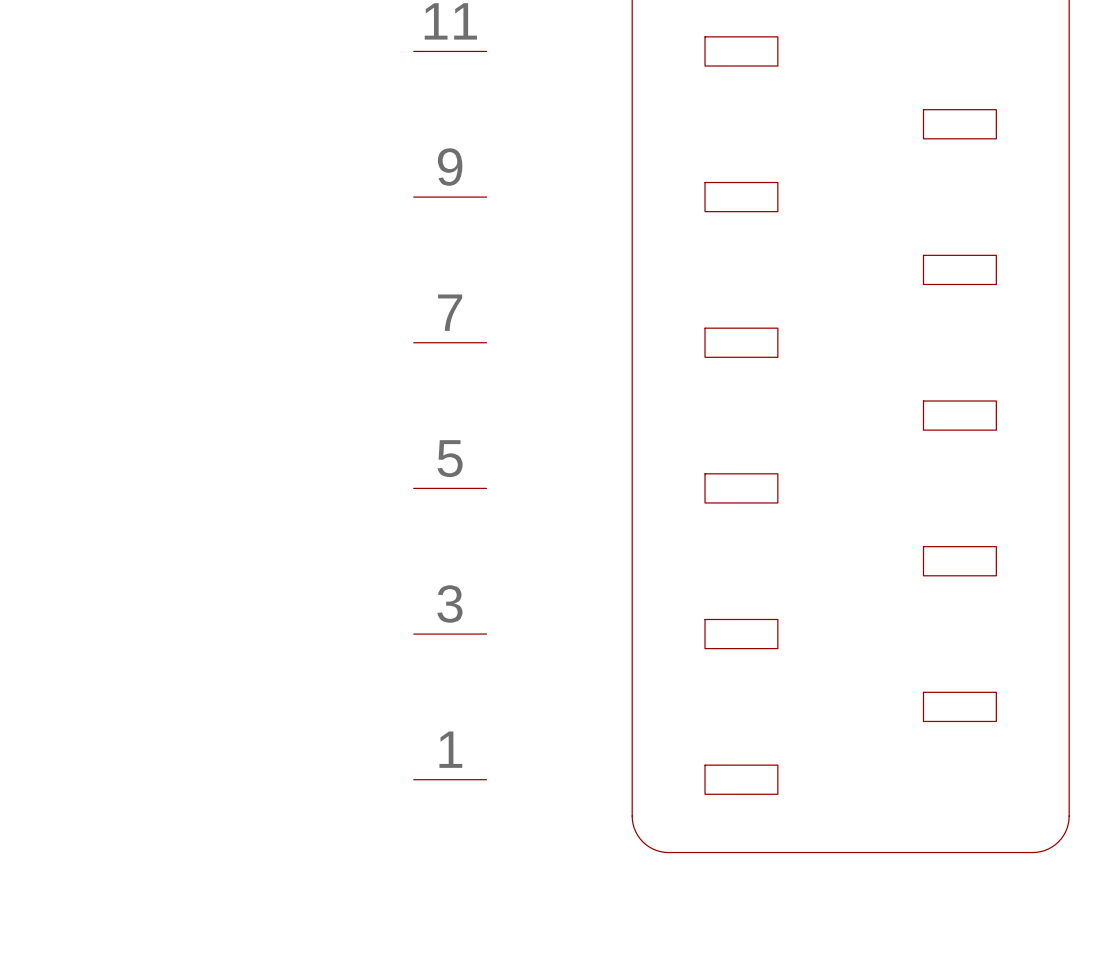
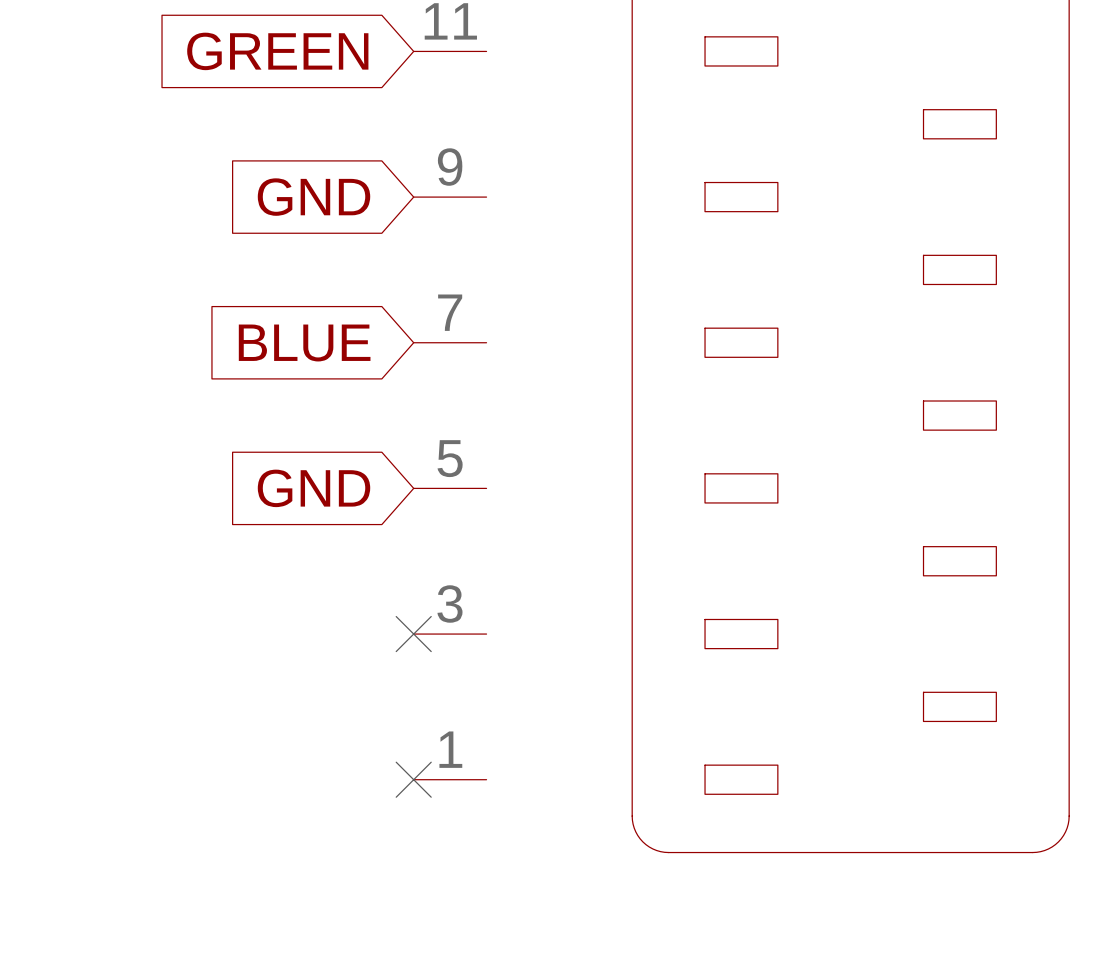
global label: none -> GREEN (277, 51)
global label: none -> GND (314, 197)
global label: none -> BLUE (304, 343)
global label: none -> GND (314, 488)
no-connect mark: none -> (413, 634)
no-connect mark: none -> (413, 779)

